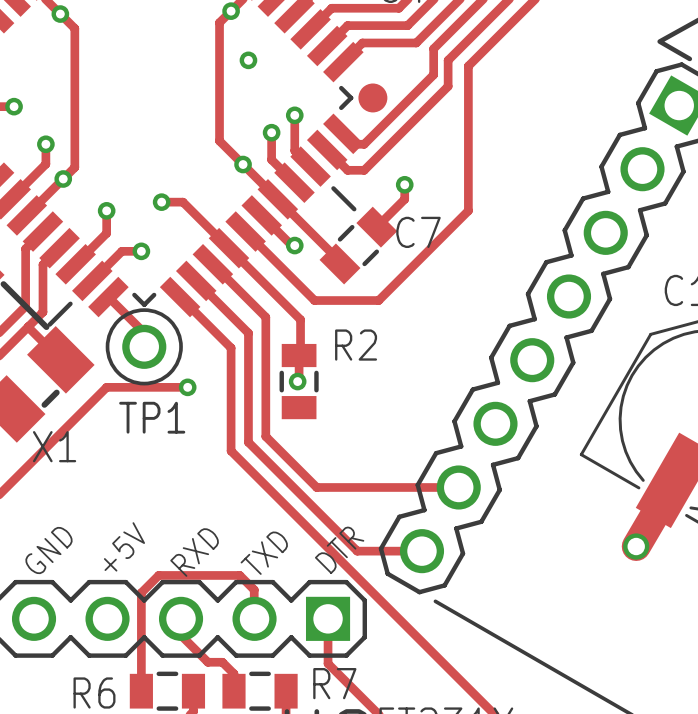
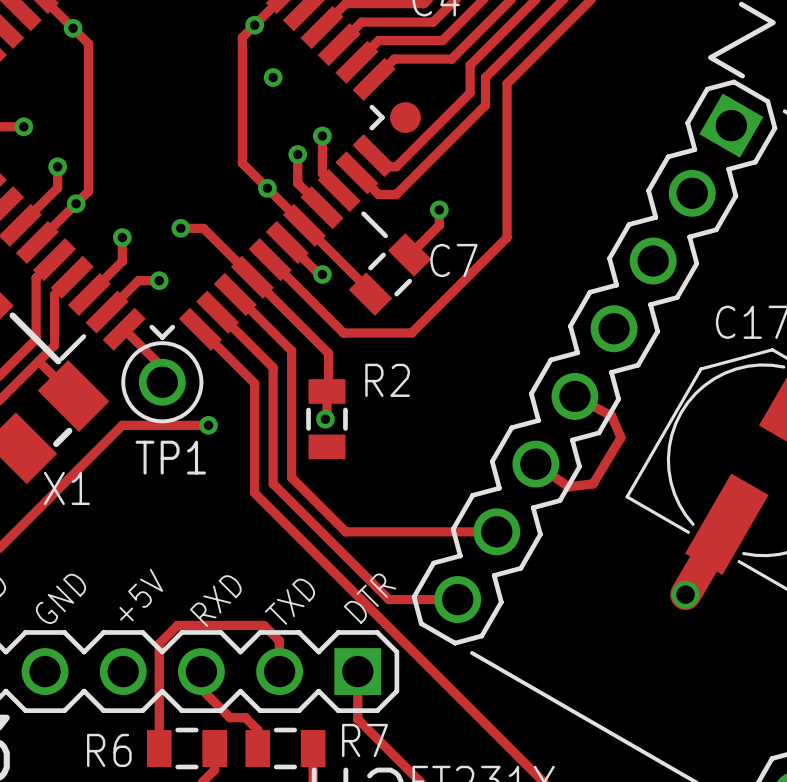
track: none -> (574, 396) (611, 416) (620, 437) (593, 483) (568, 486) (535, 464)

